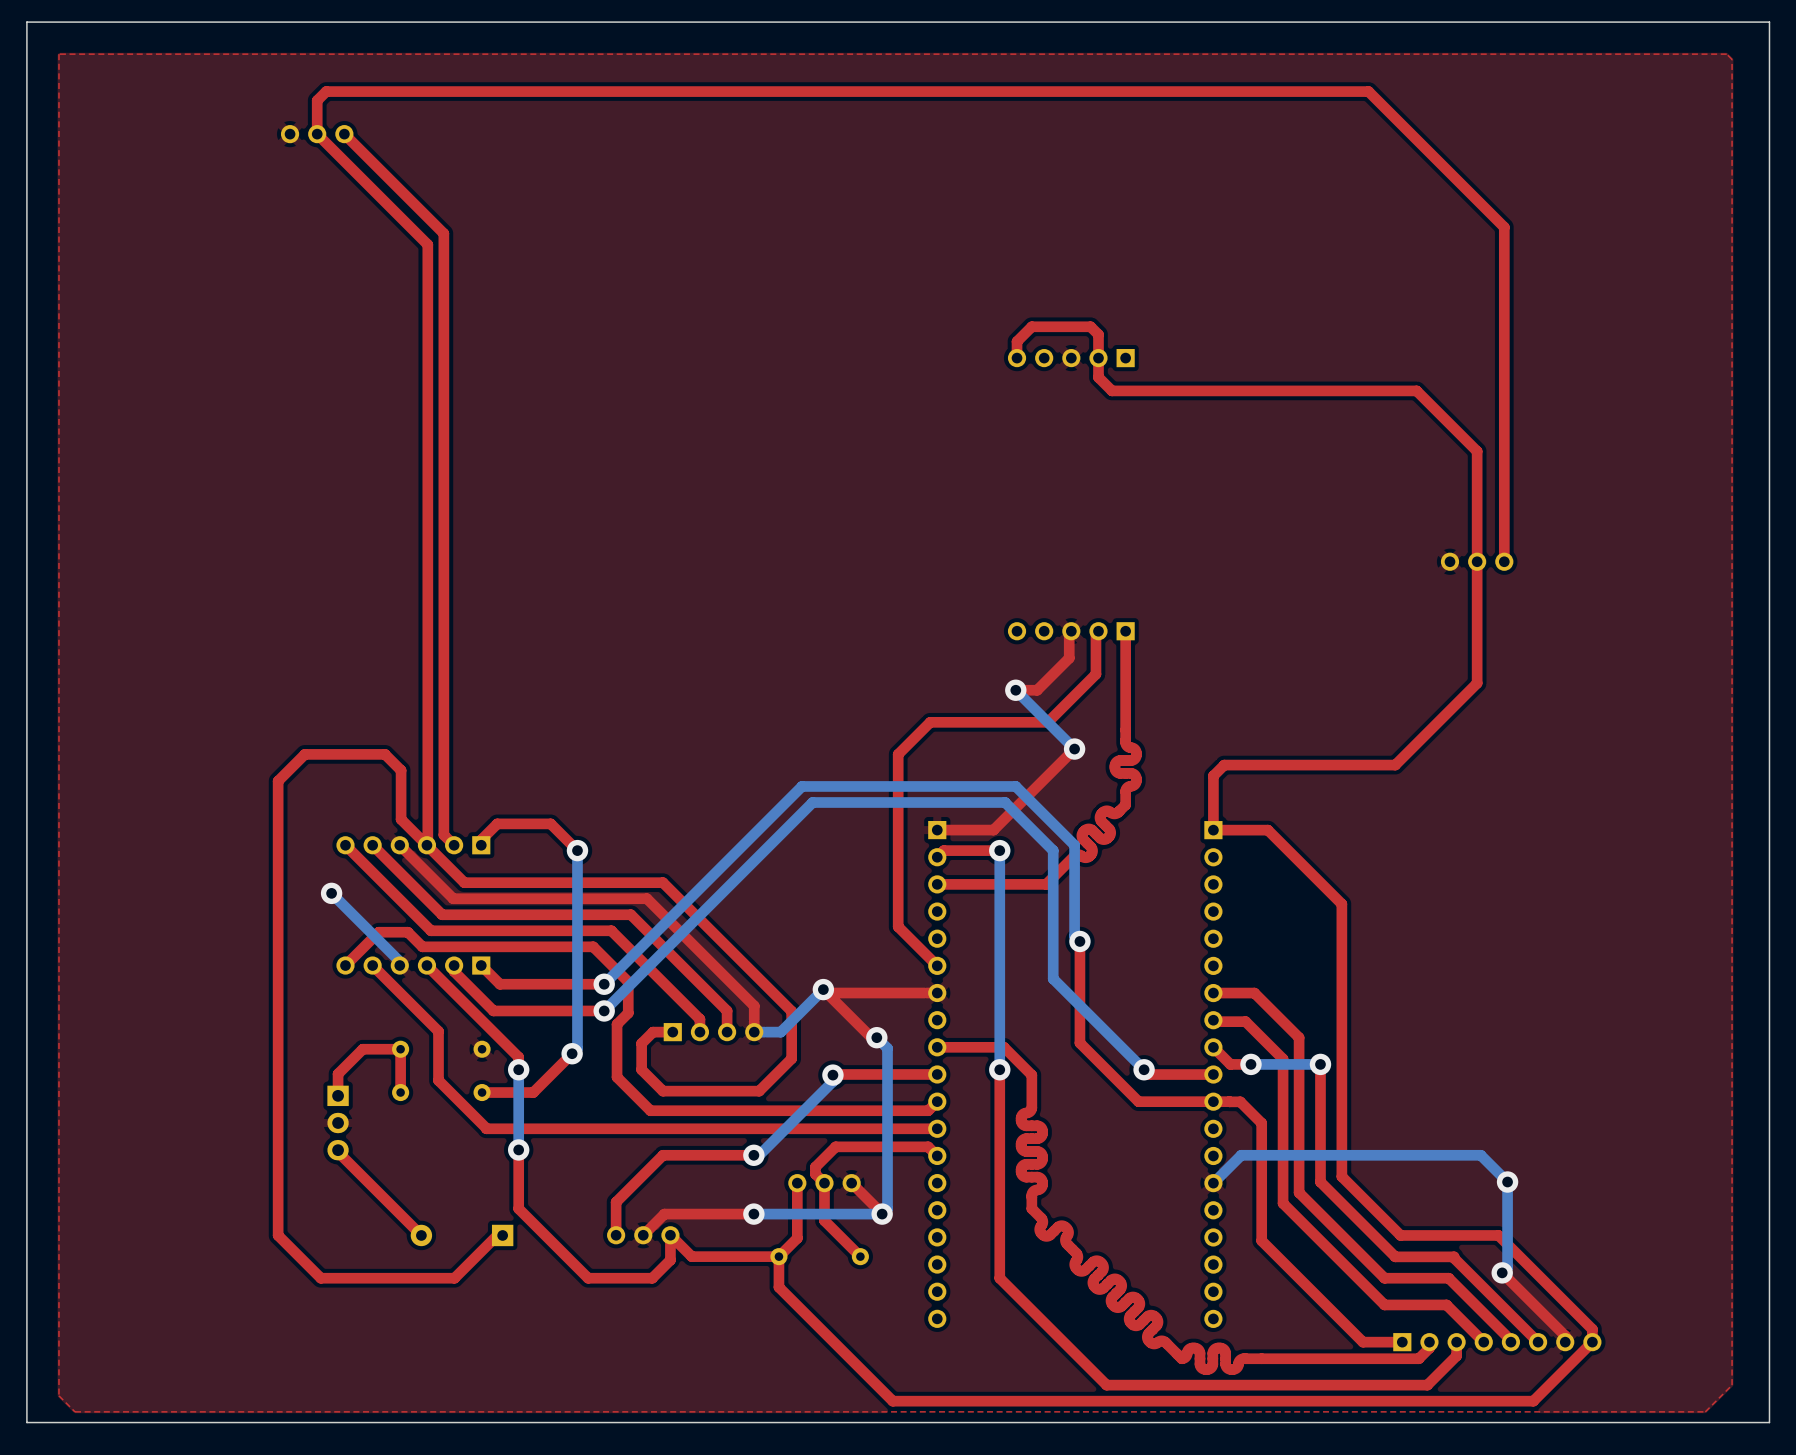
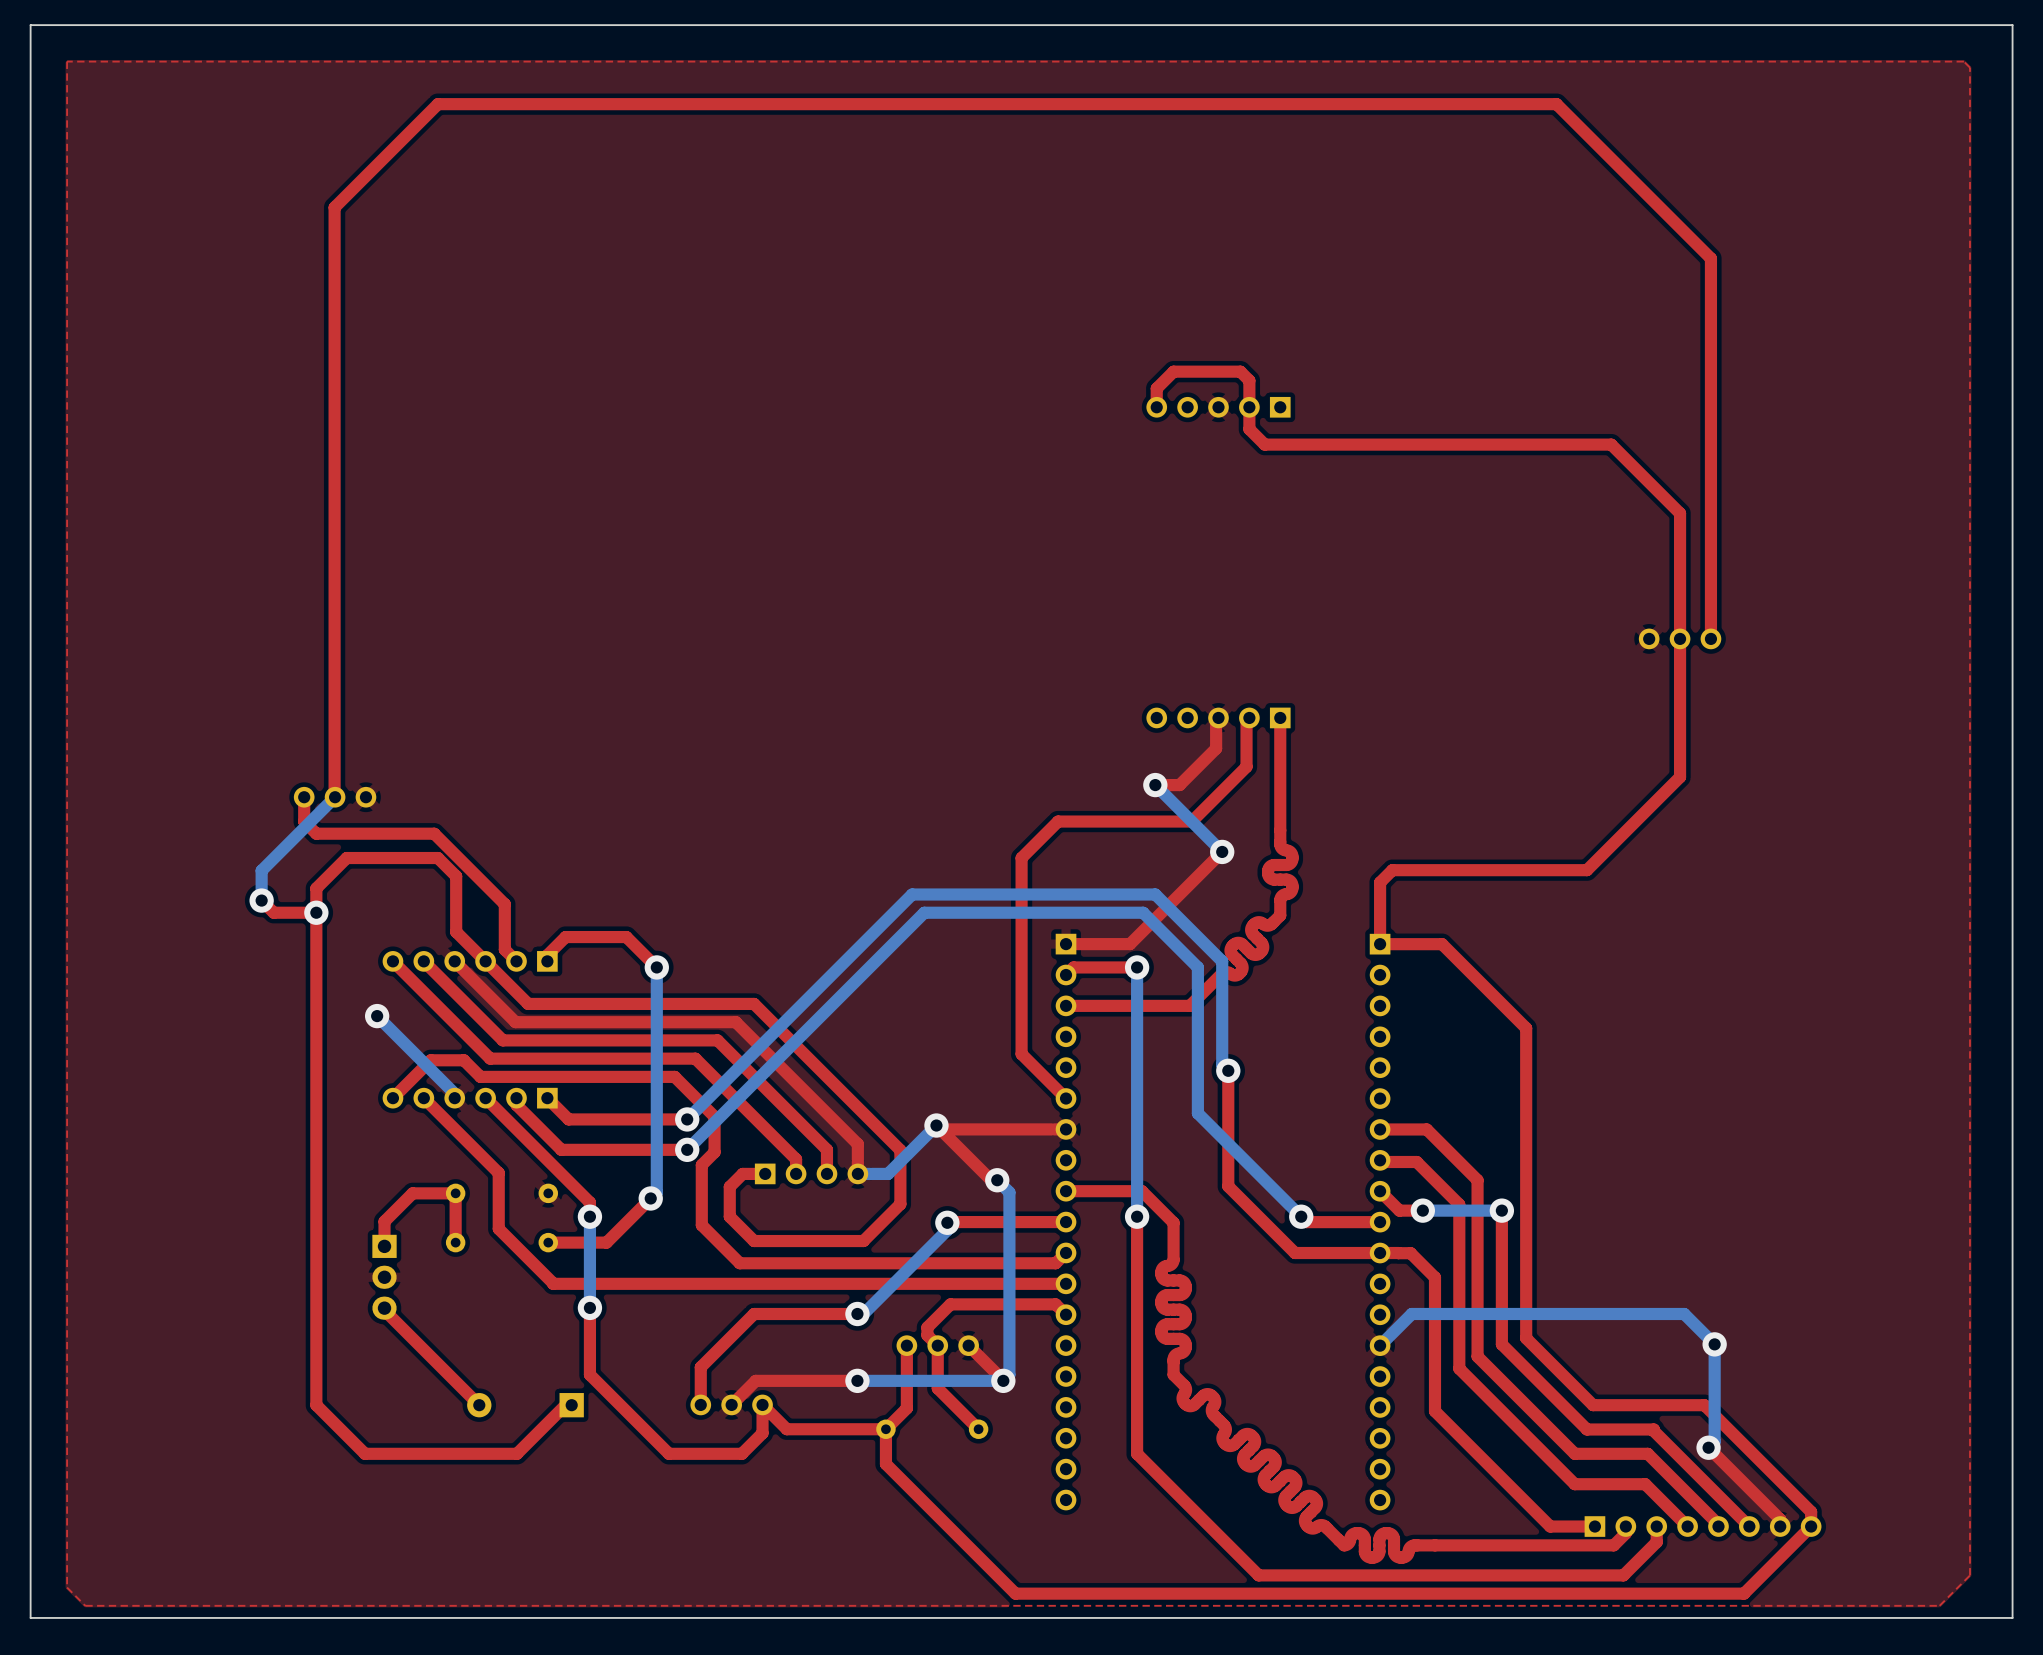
top track: (385, 91) (326, 91) (317, 100) (317, 134) (427, 244) (427, 844) -> (437, 104) (334, 207) (335, 797)
part: (317, 134) -> none
top track: (344, 134) (443, 233) (443, 795) -> (304, 797) (304, 821) (316, 833) (434, 833) (504, 904)
bottom track: none -> (335, 797) (261, 870) (261, 900)
part: none -> (335, 797)
top track: none -> (261, 900) (273, 912) (316, 912)
via: none -> (261, 900)
via: none -> (316, 912)

